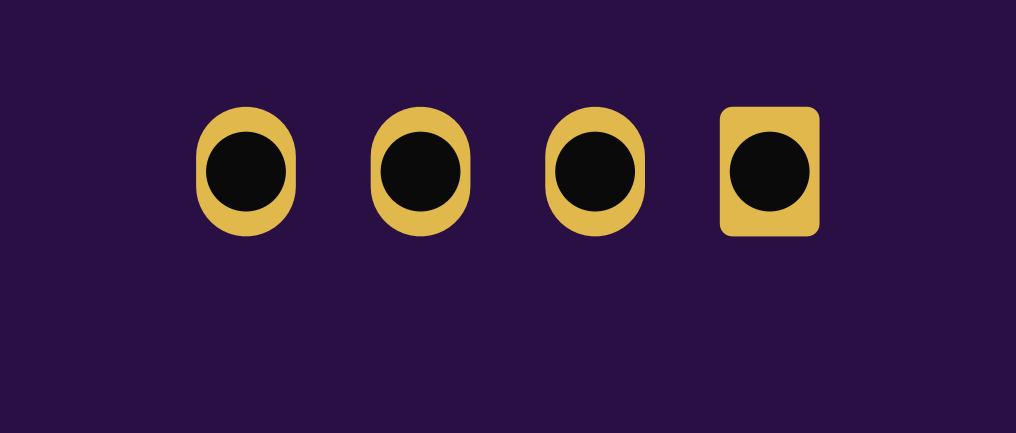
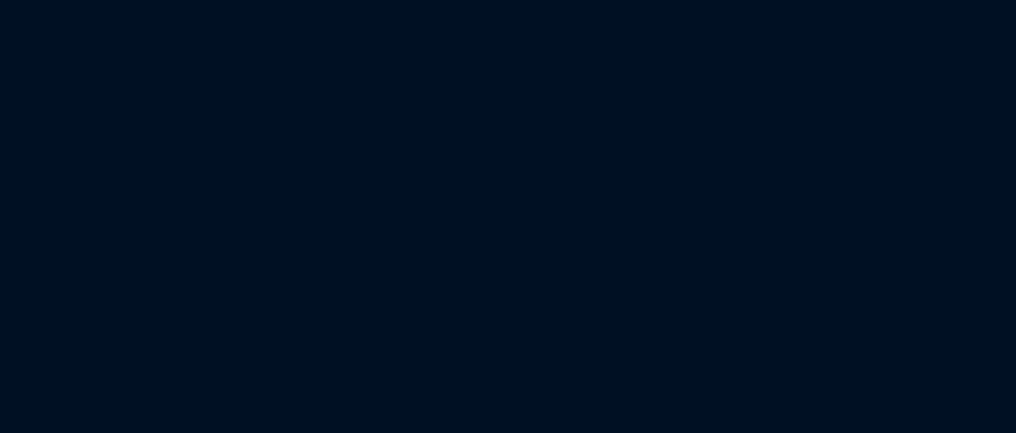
part: (507, 171) -> none

